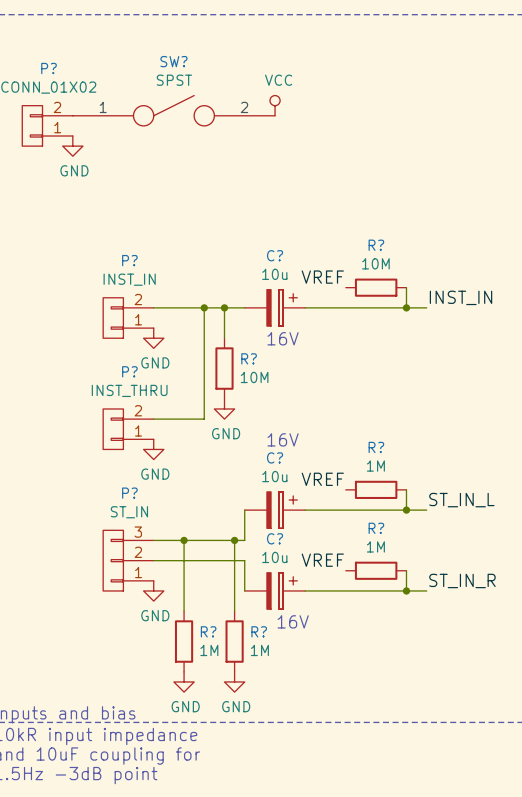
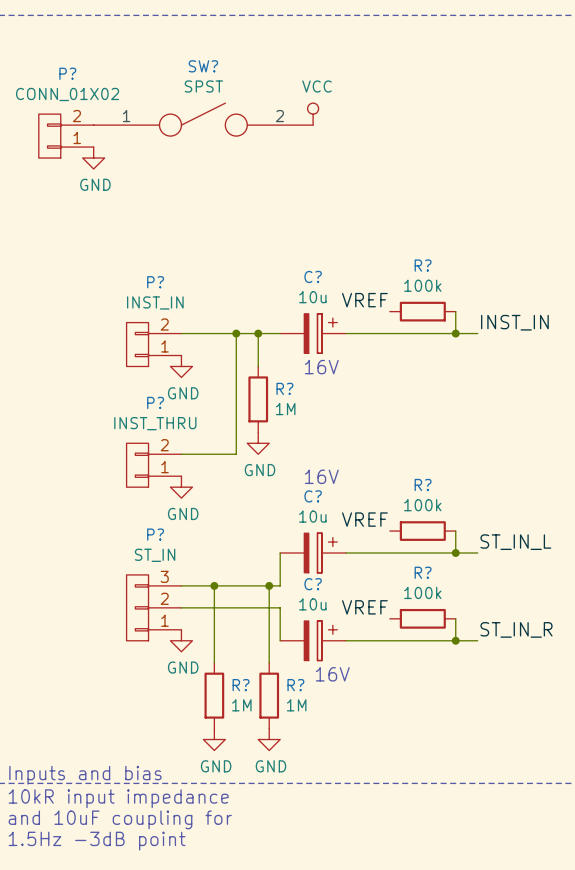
R? value: 10M (375, 263) -> 100k (422, 285)
R? value: 10M (254, 377) -> 1M (285, 409)
R? value: 1M (375, 466) -> 100k (422, 505)
R? value: 1M (375, 546) -> 100k (422, 592)

